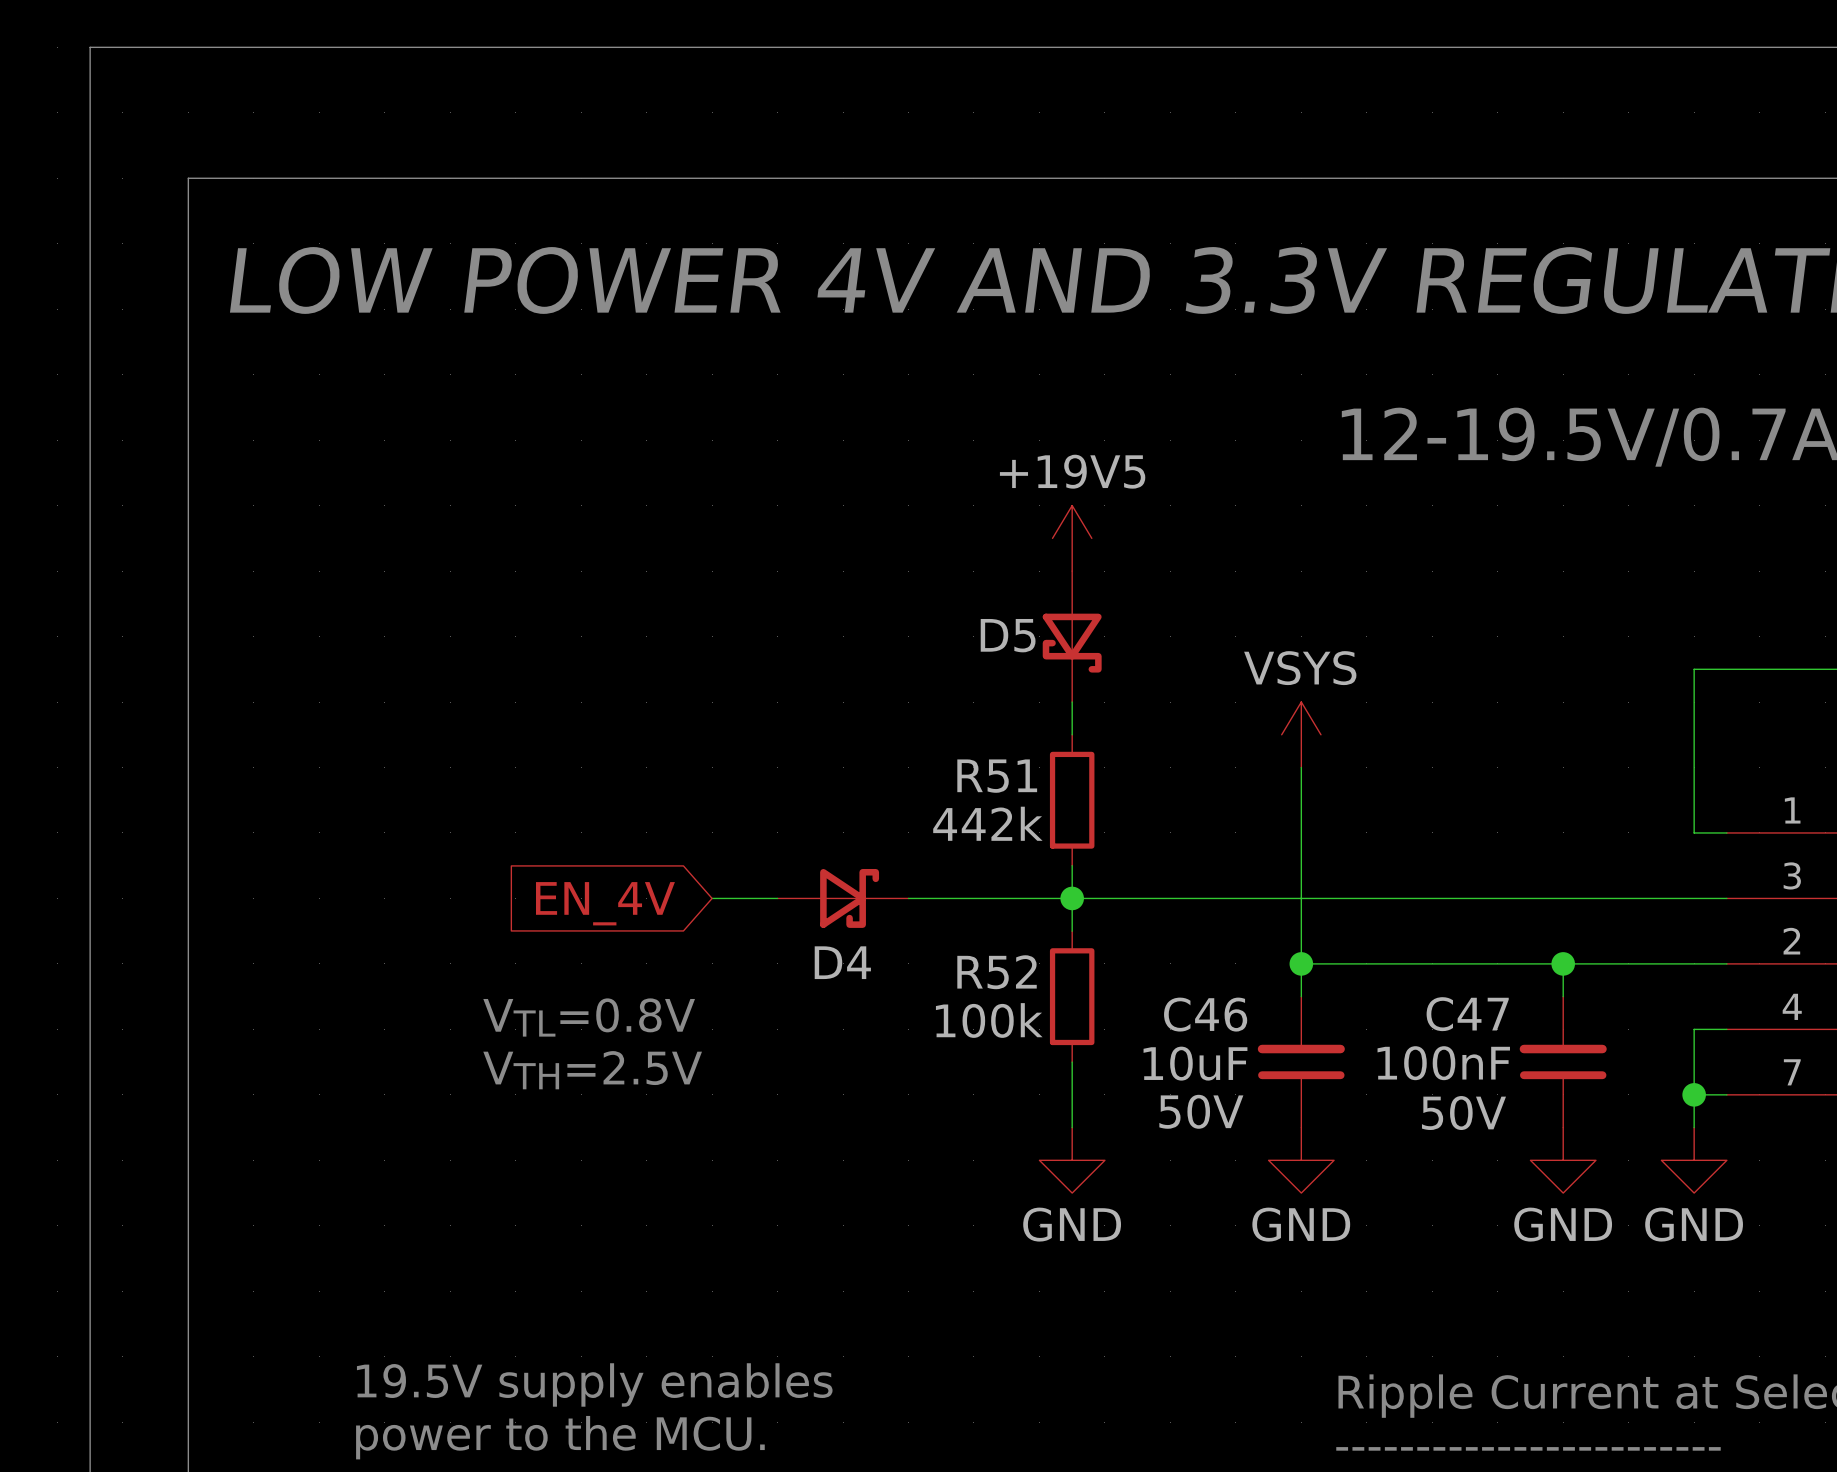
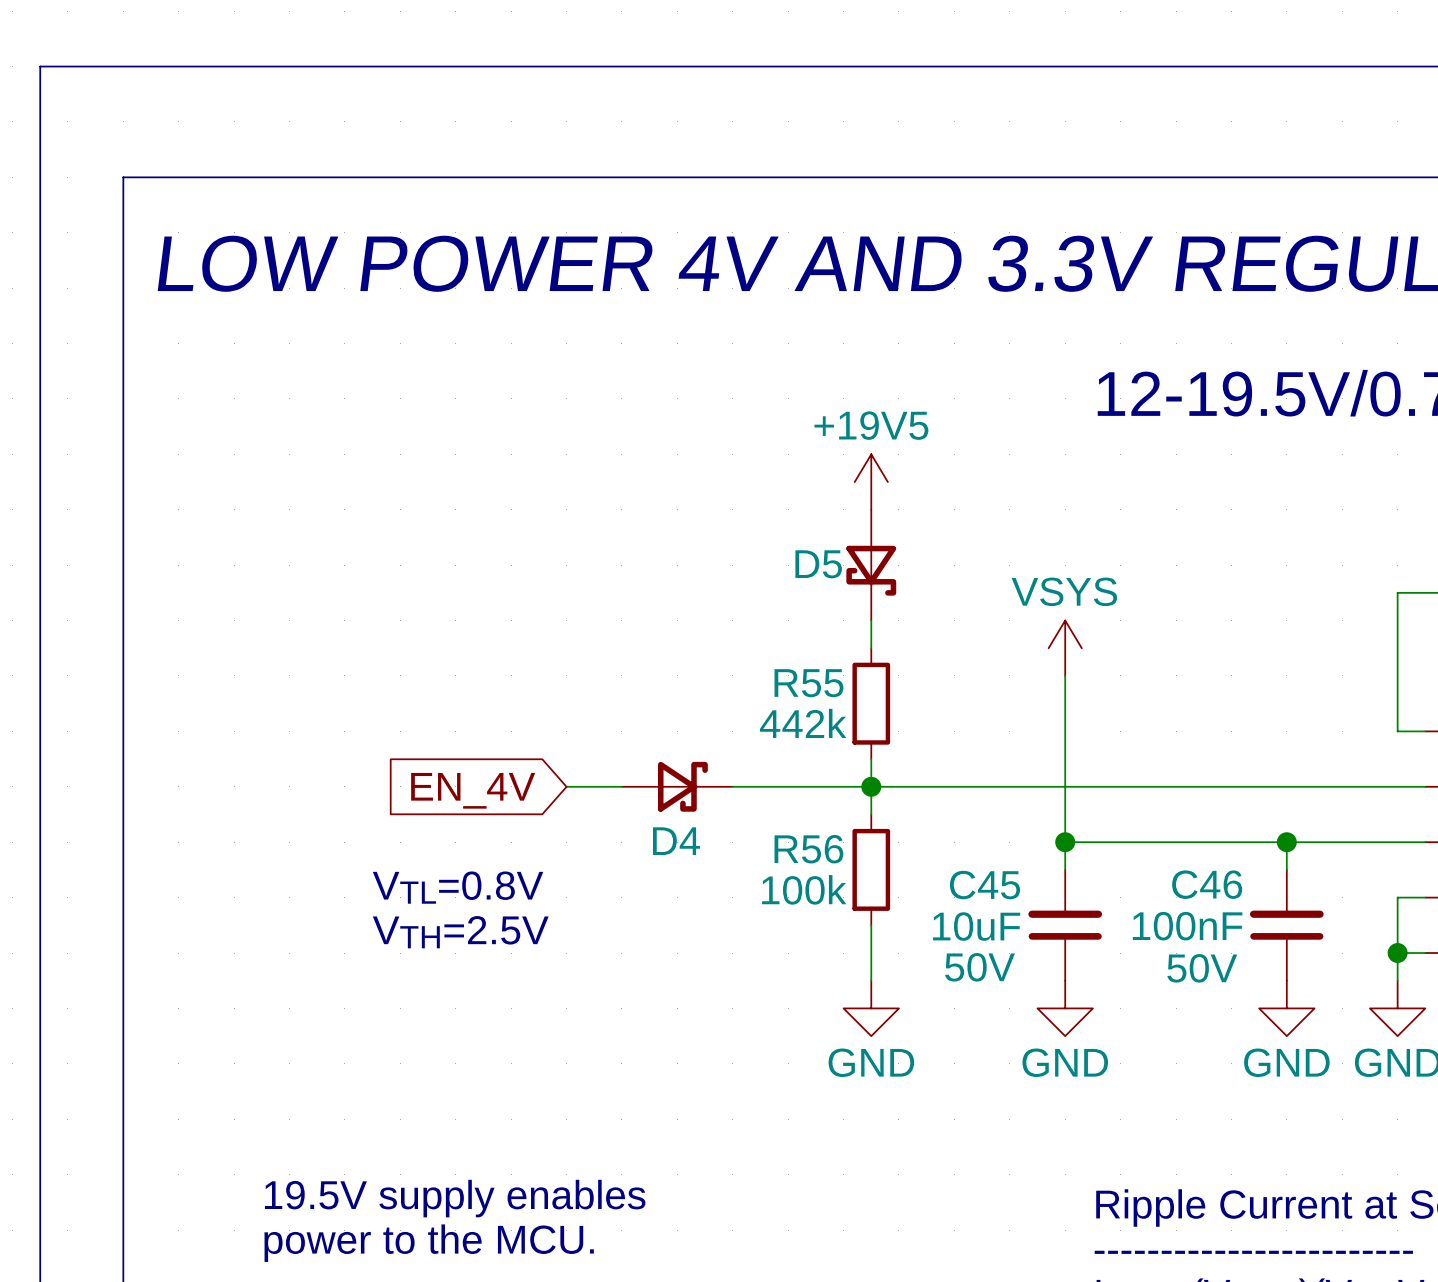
R51 name: R51 (997, 776) -> R55 (808, 683)
R52 name: R52 (997, 972) -> R56 (808, 849)
C46 name: C46 (1205, 1014) -> C45 (985, 885)
C47 name: C47 (1467, 1014) -> C46 (1207, 884)

